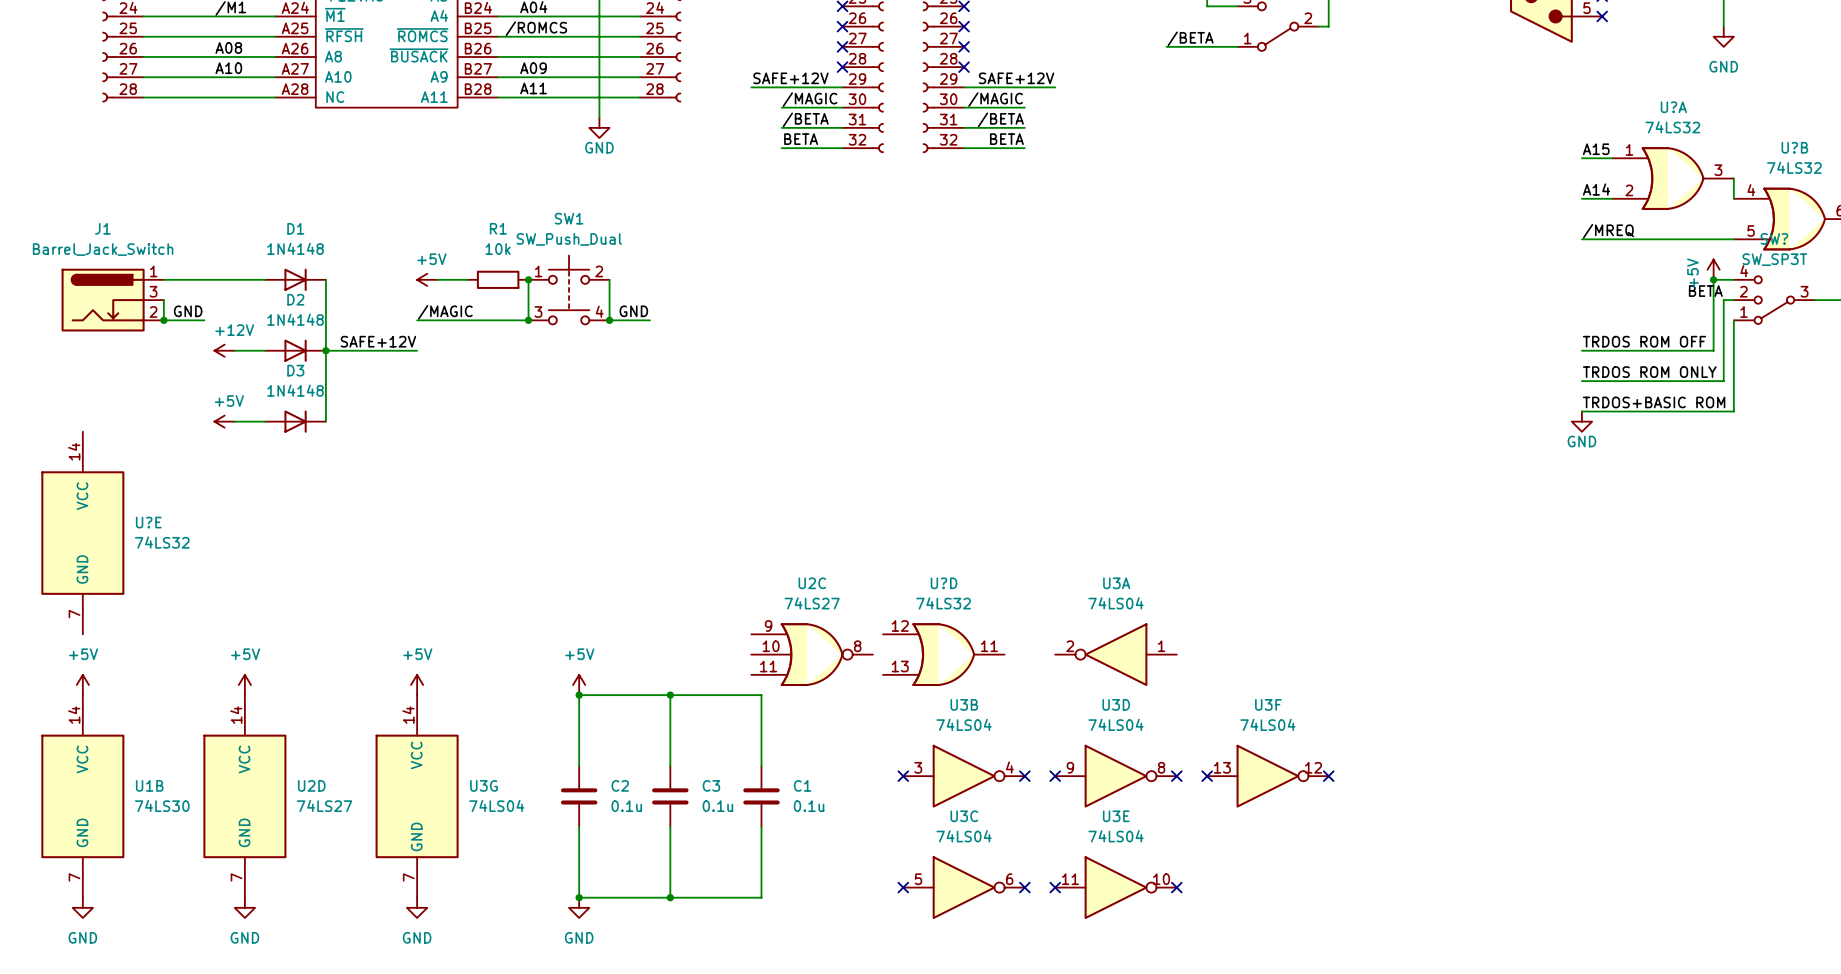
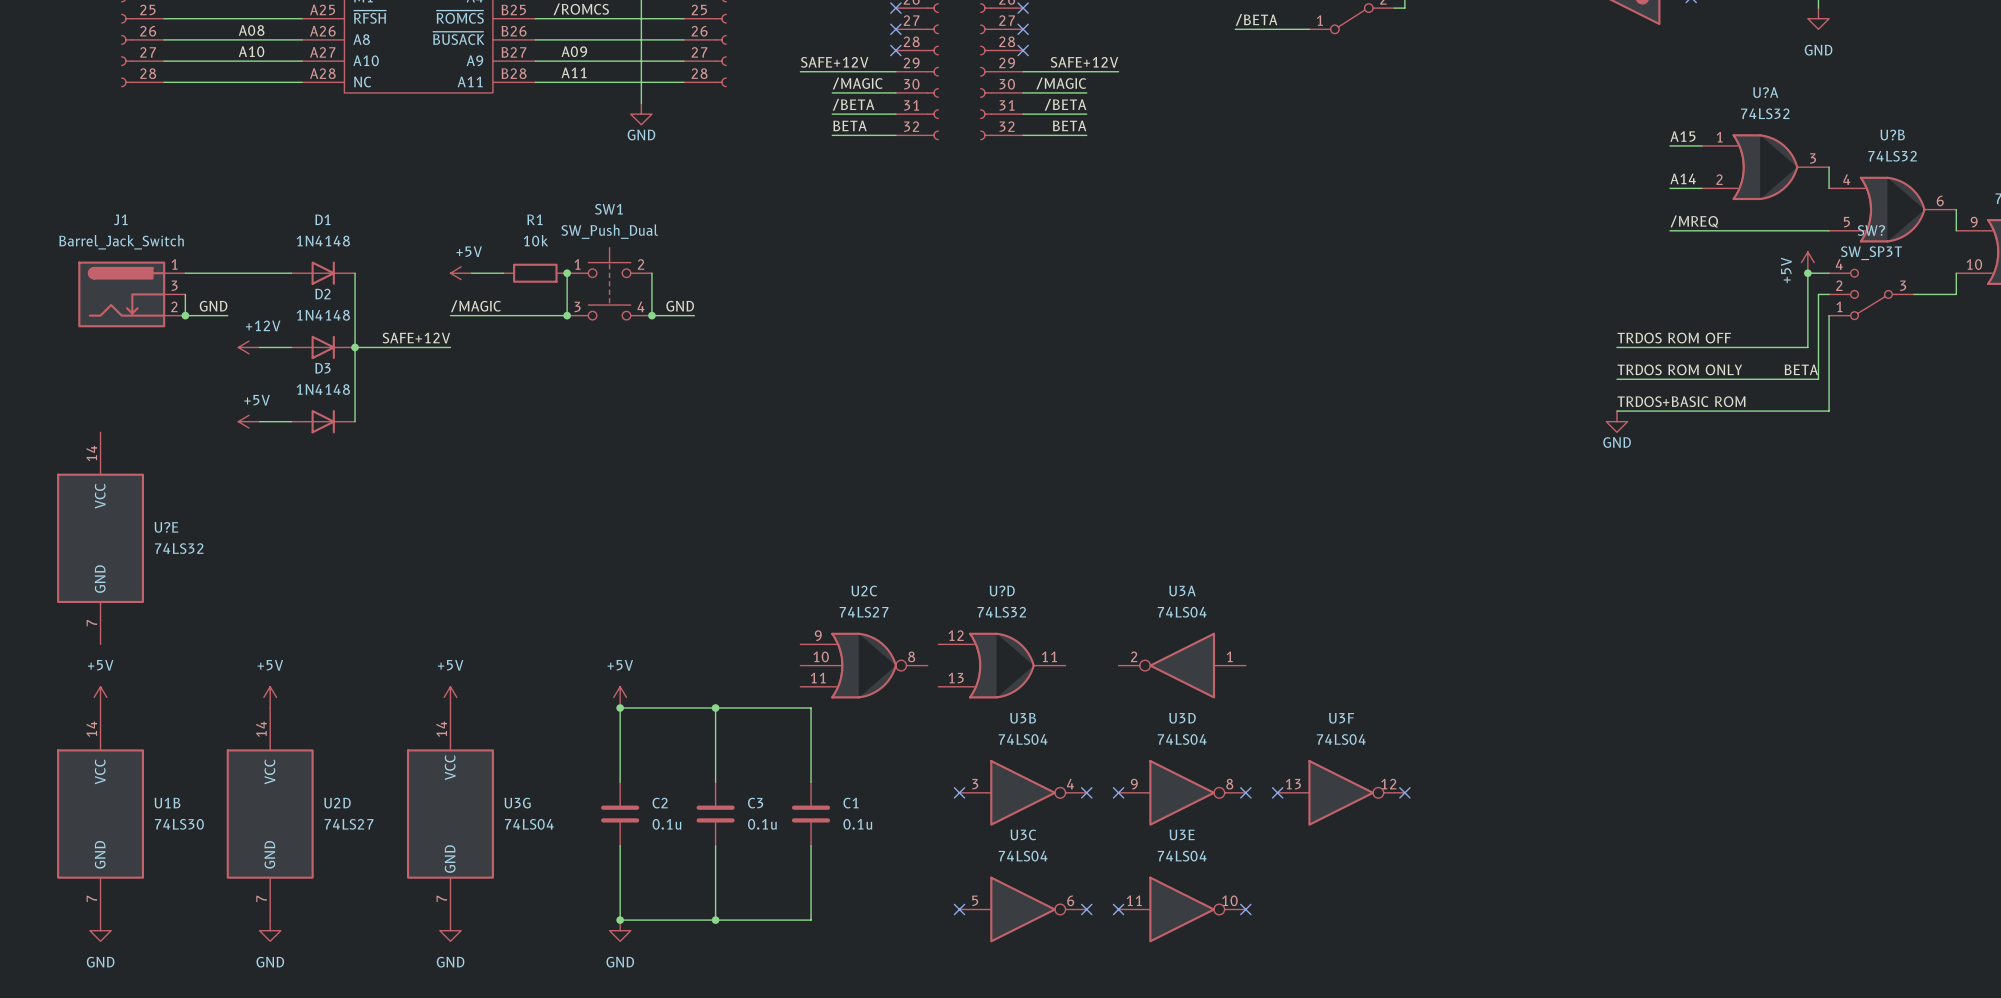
label position: BETA (1705, 291) -> BETA (1801, 369)
label position: TRDOS ROM OFF (1644, 341) -> TRDOS ROM OFF (1674, 338)
wire: none -> (1616, 347) (1670, 347)
label position: TRDOS ROM ONLY (1649, 372) -> TRDOS ROM ONLY (1679, 369)
wire: none -> (1616, 379) (1670, 379)
label position: TRDOS+BASIC ROM (1654, 402) -> TRDOS+BASIC ROM (1681, 401)
wire: none -> (1616, 411) (1670, 411)
power symbol position: GND (1581, 421) -> GND (1616, 421)

